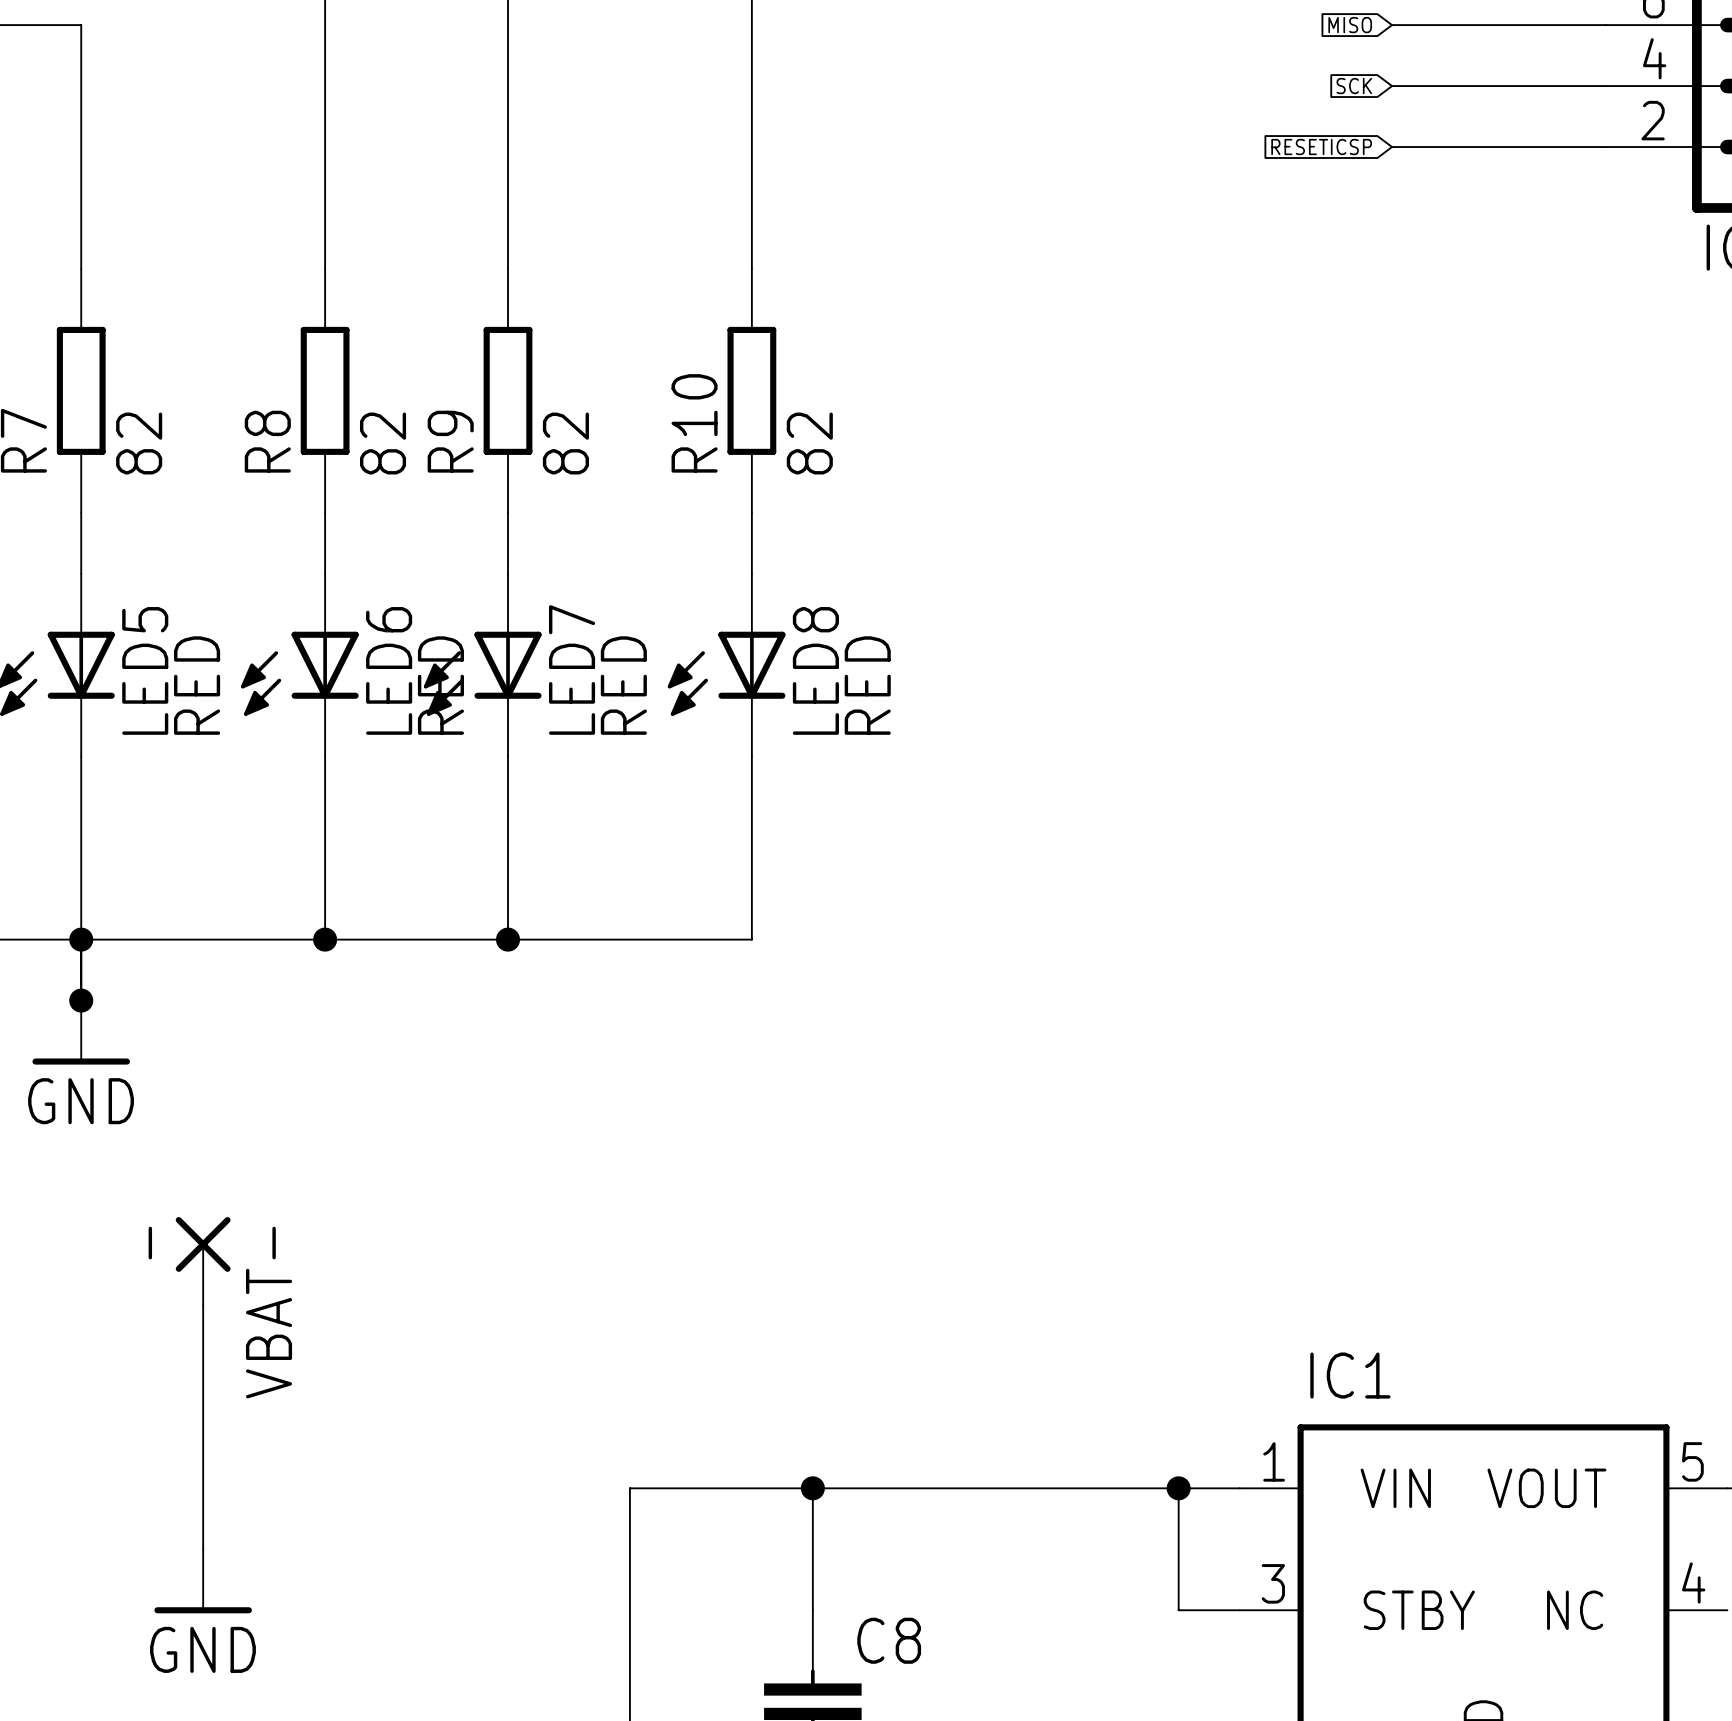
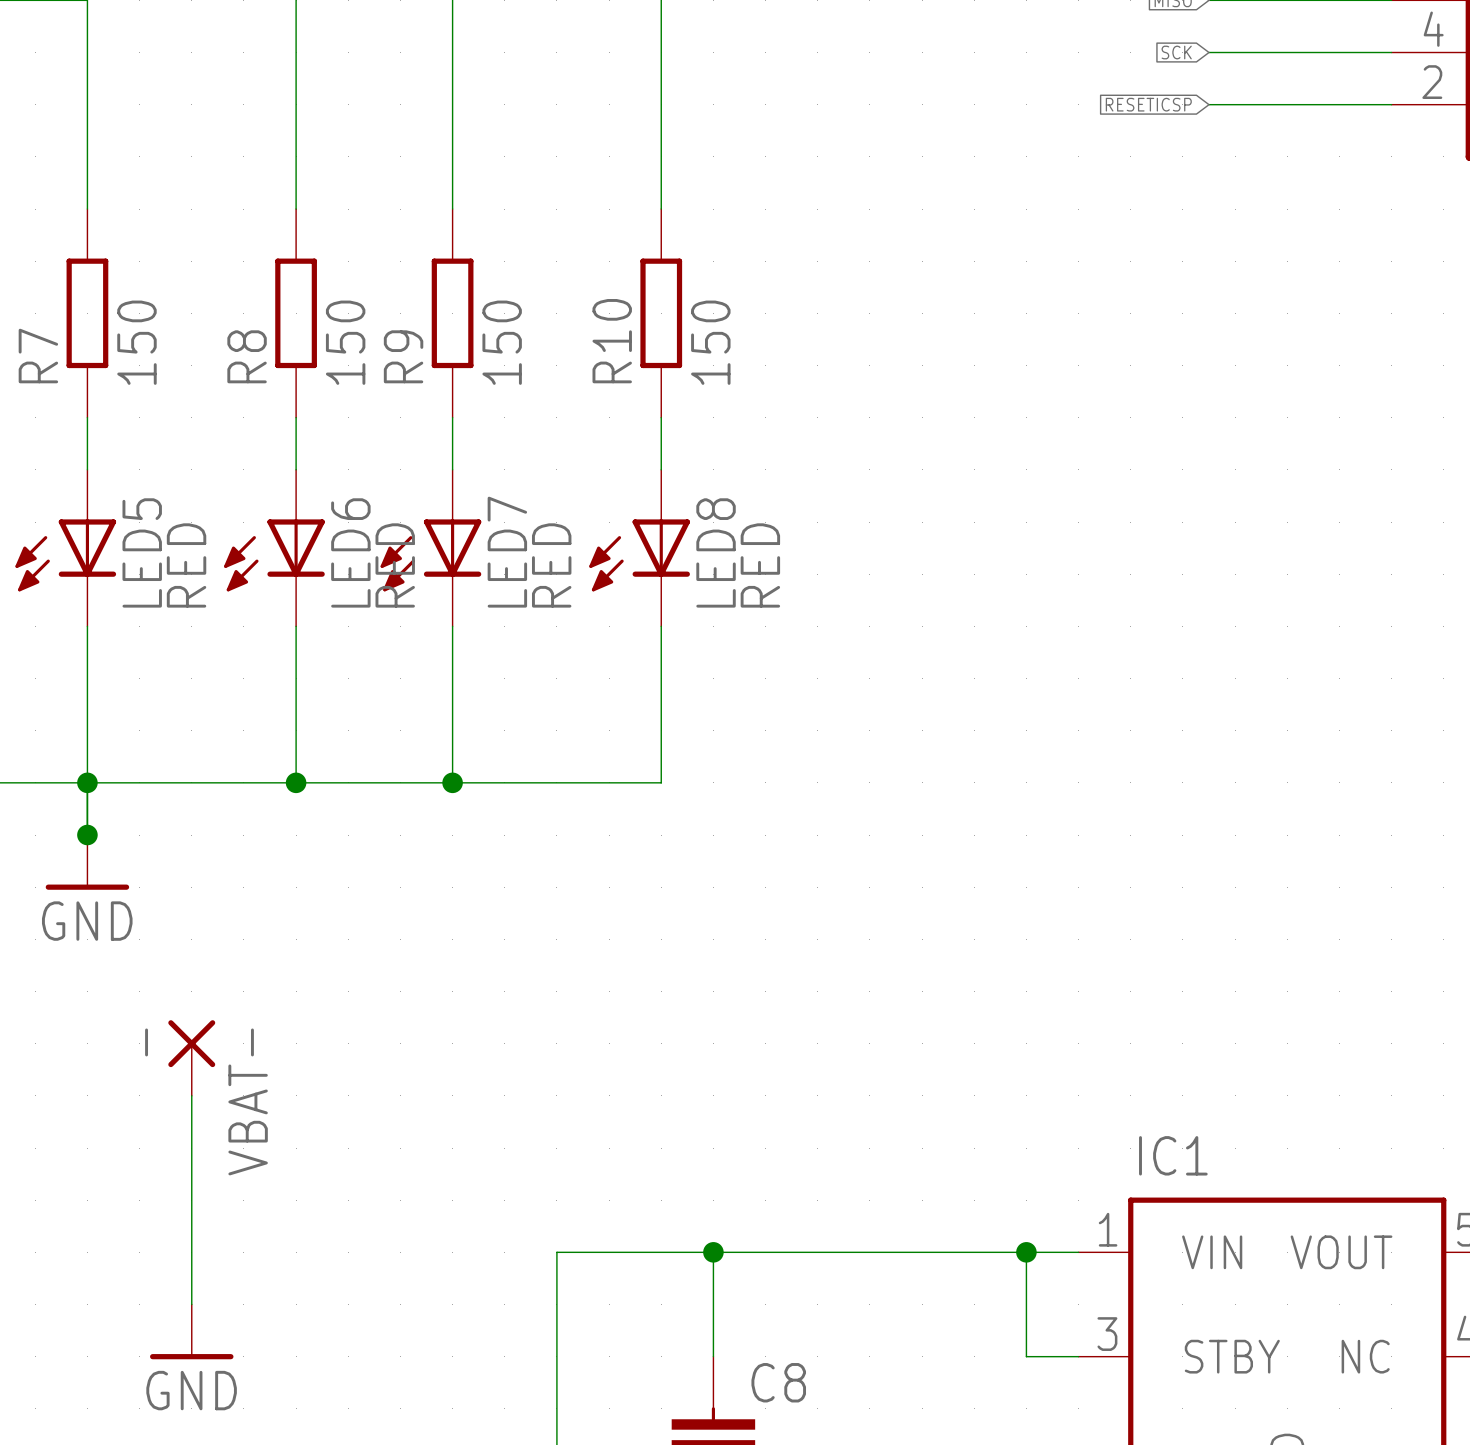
R7 value: 82 (139, 443) -> 150 (136, 342)
R8 value: 82 (383, 443) -> 150 (345, 342)
R9 value: 82 (565, 443) -> 150 (502, 342)
R10 value: 82 (809, 443) -> 150 (710, 342)

